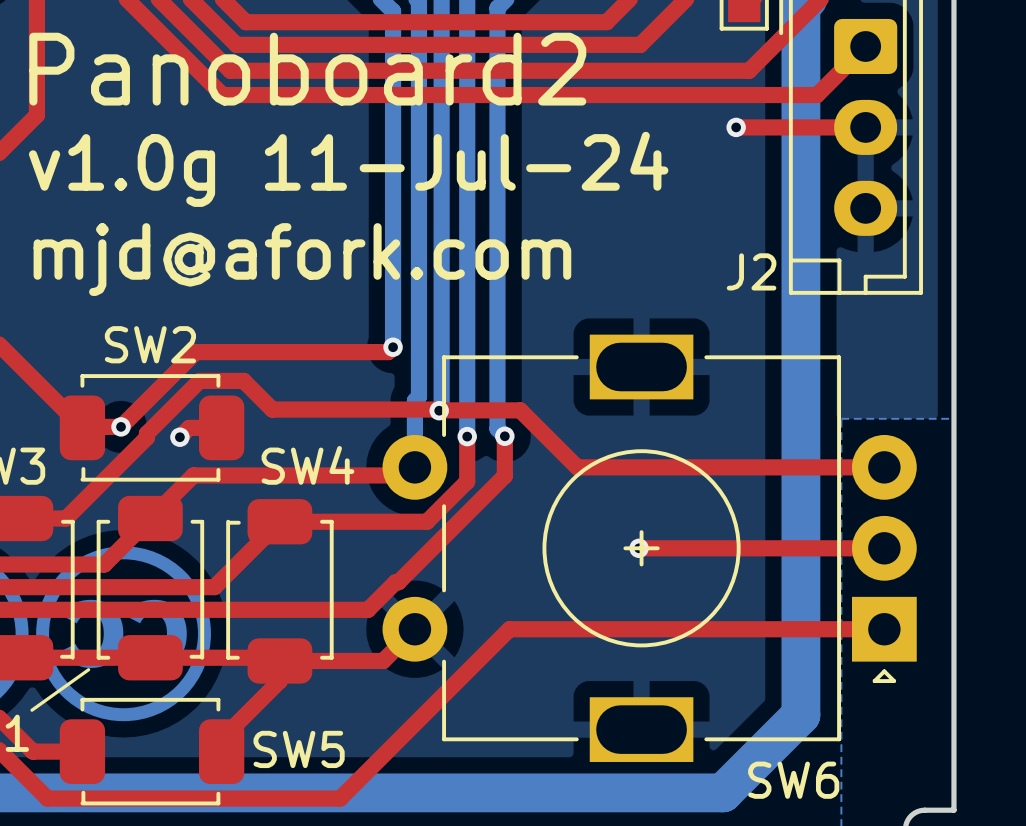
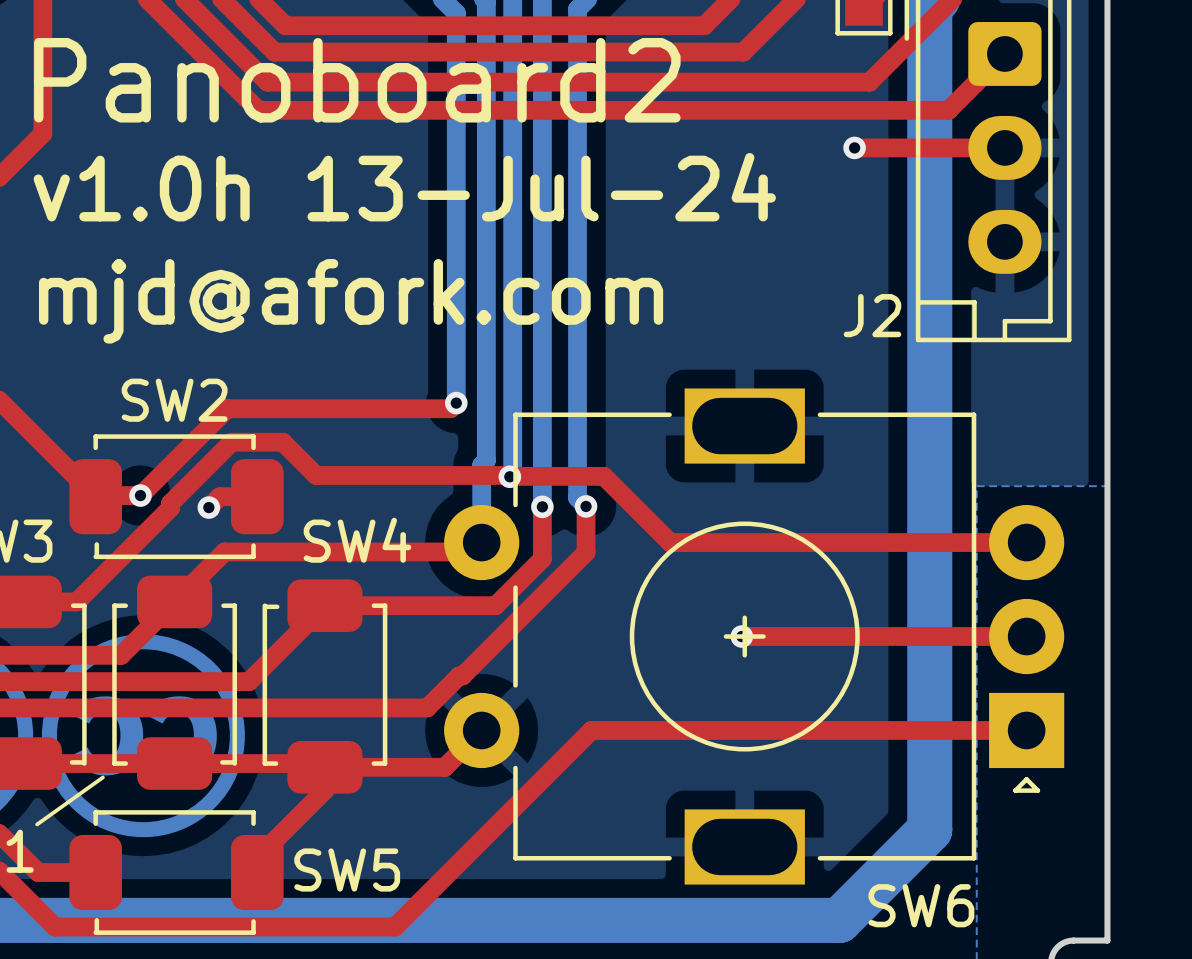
text: v1.0g 11-Jul-24 (348, 169) -> v1.0h 13-Jul-24 (404, 187)

